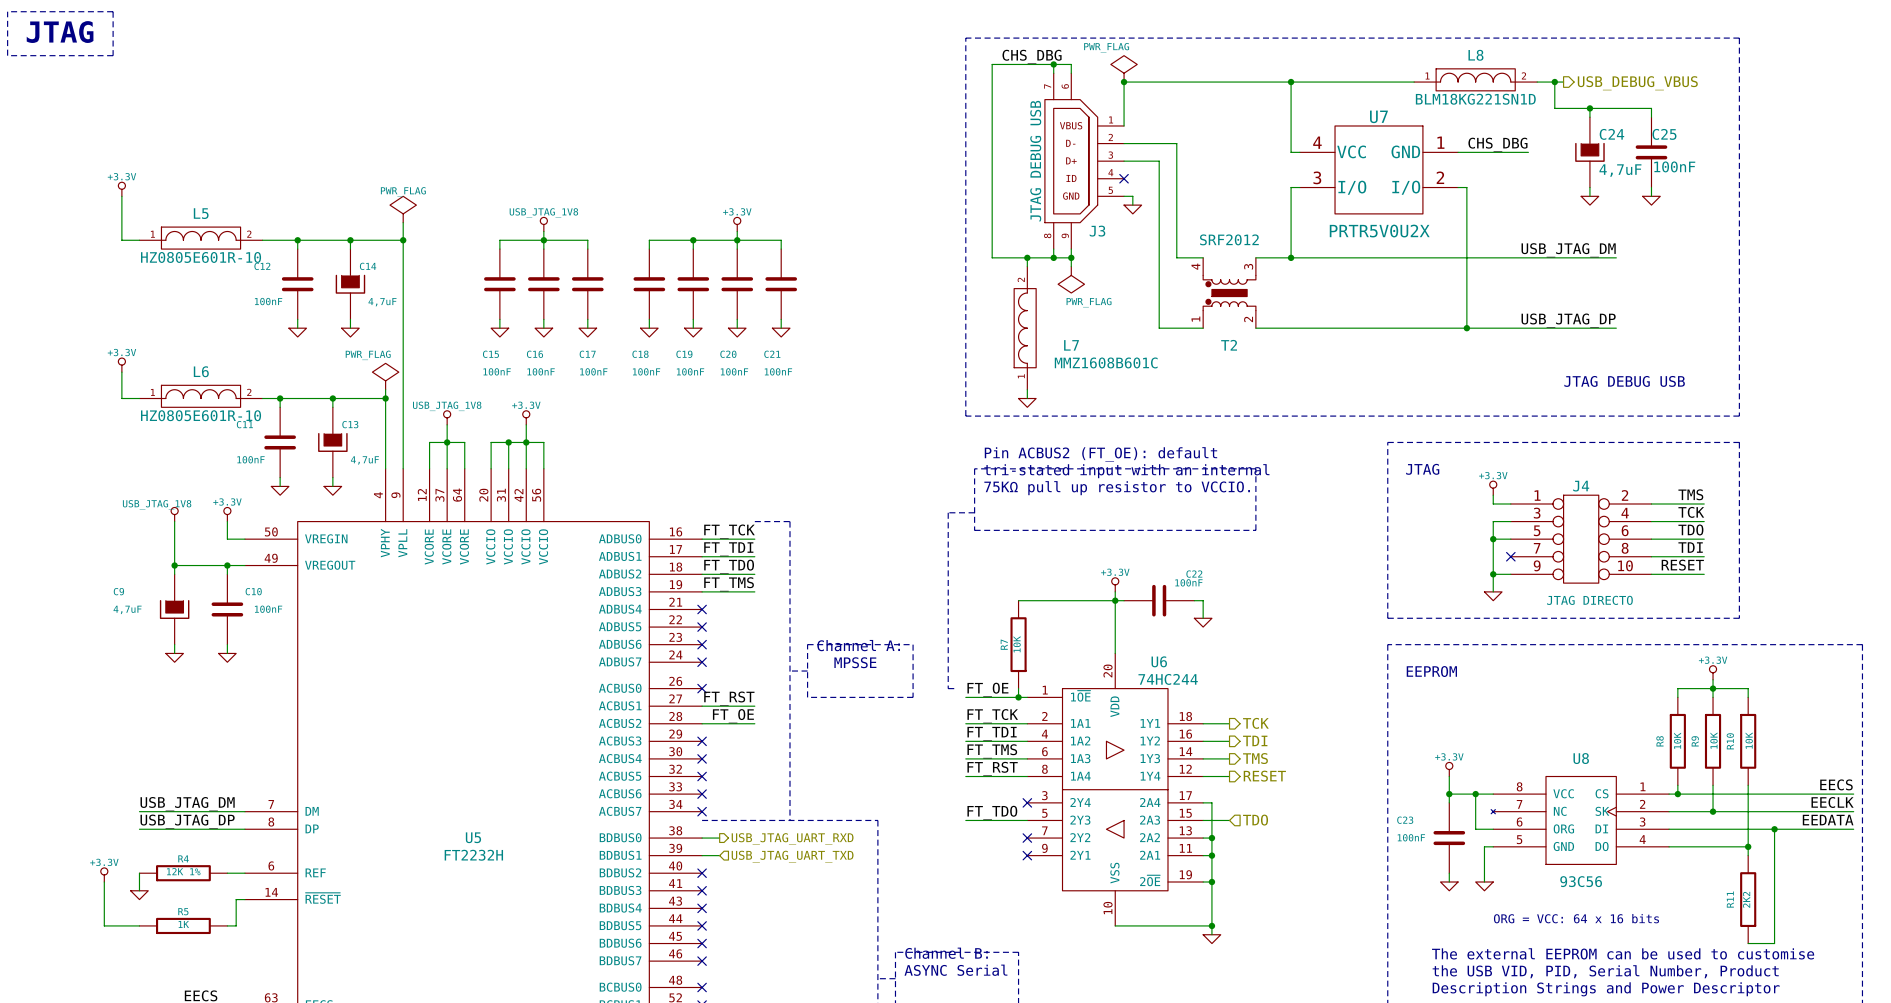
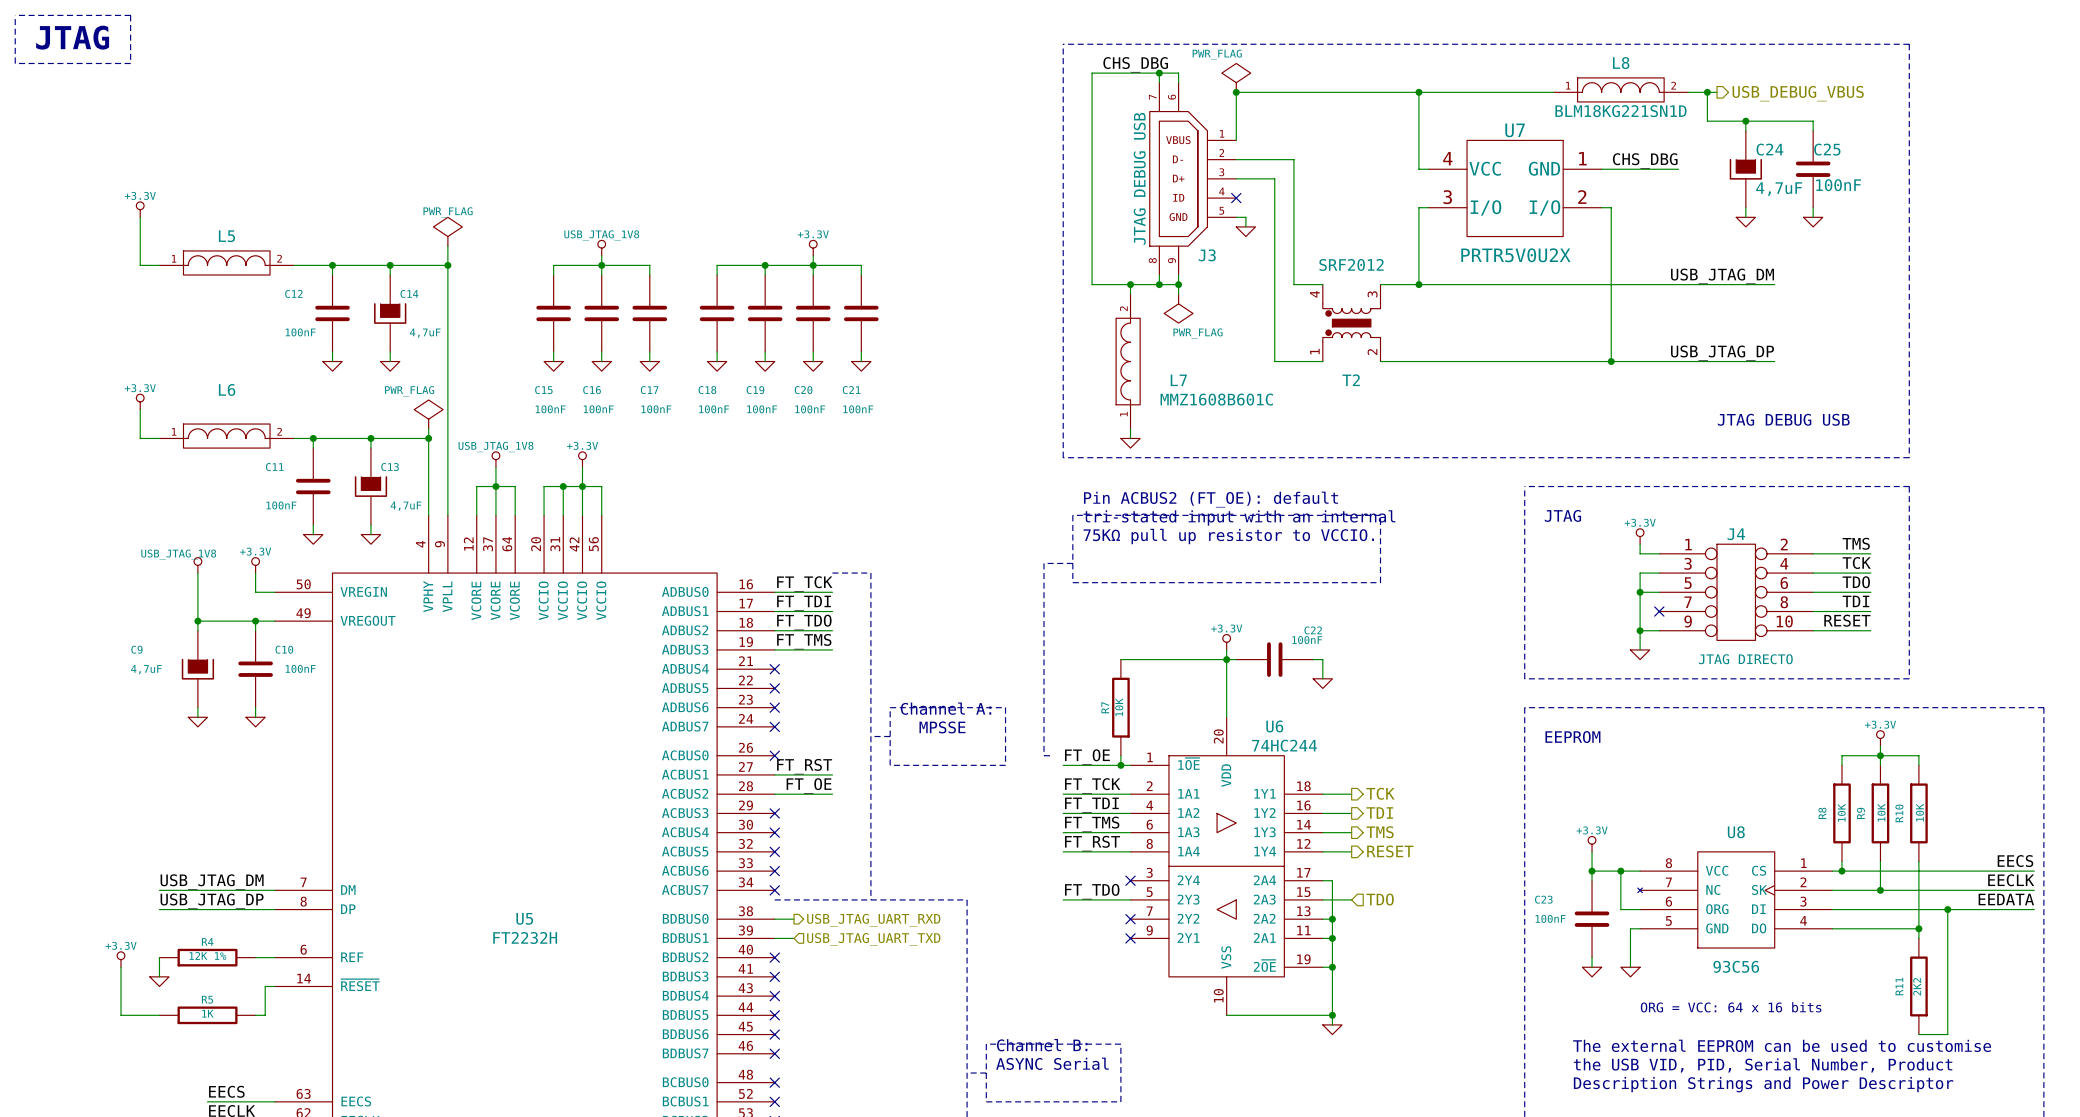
L5 value: HZ0805E601R-10 (201, 257) -> none
L6 name position: L6 (201, 371) -> L6 (227, 389)
L6 value: HZ0805E601R-10 (201, 415) -> none

